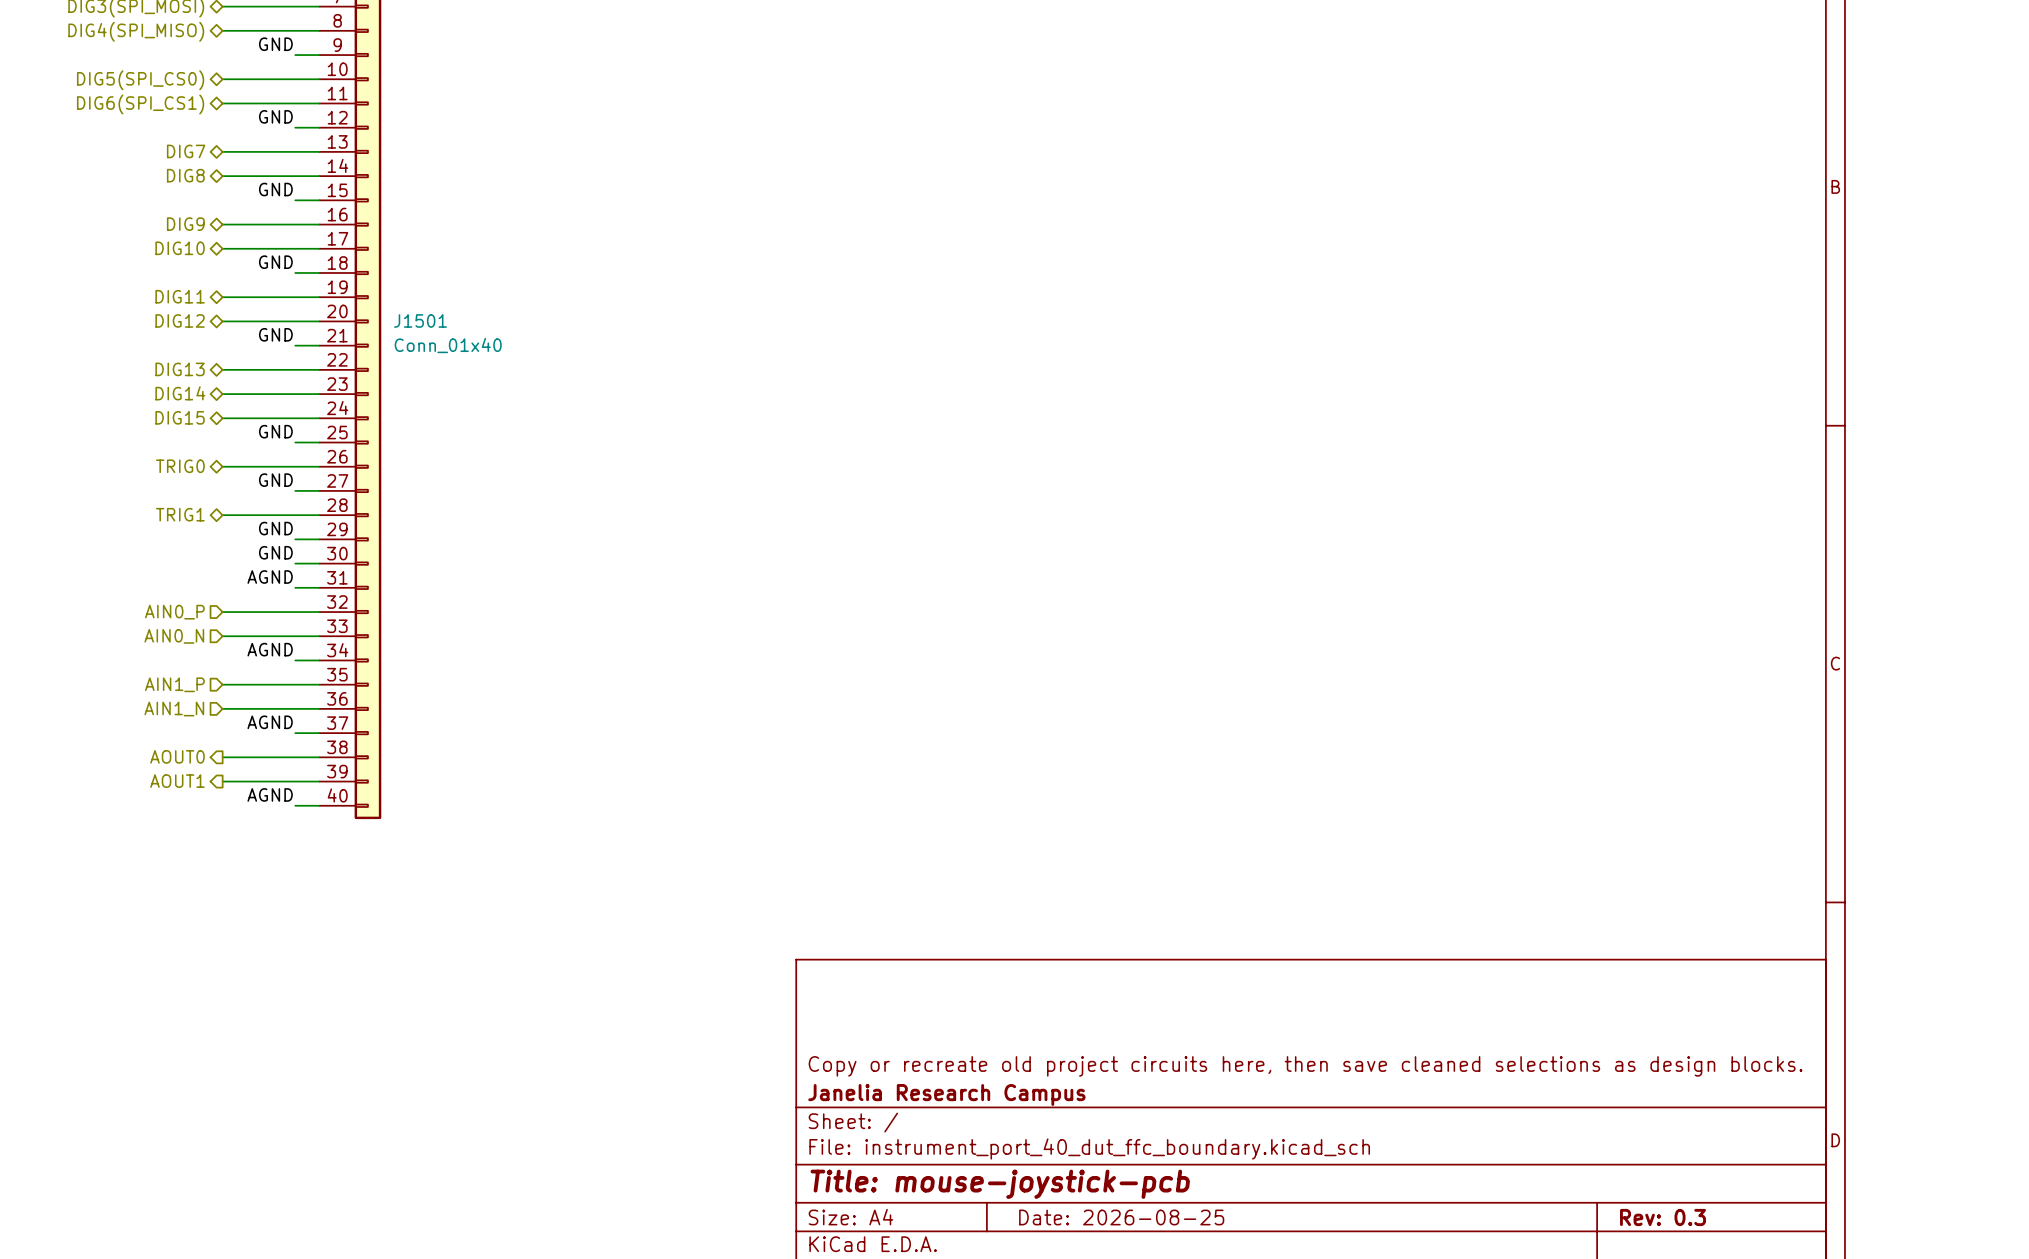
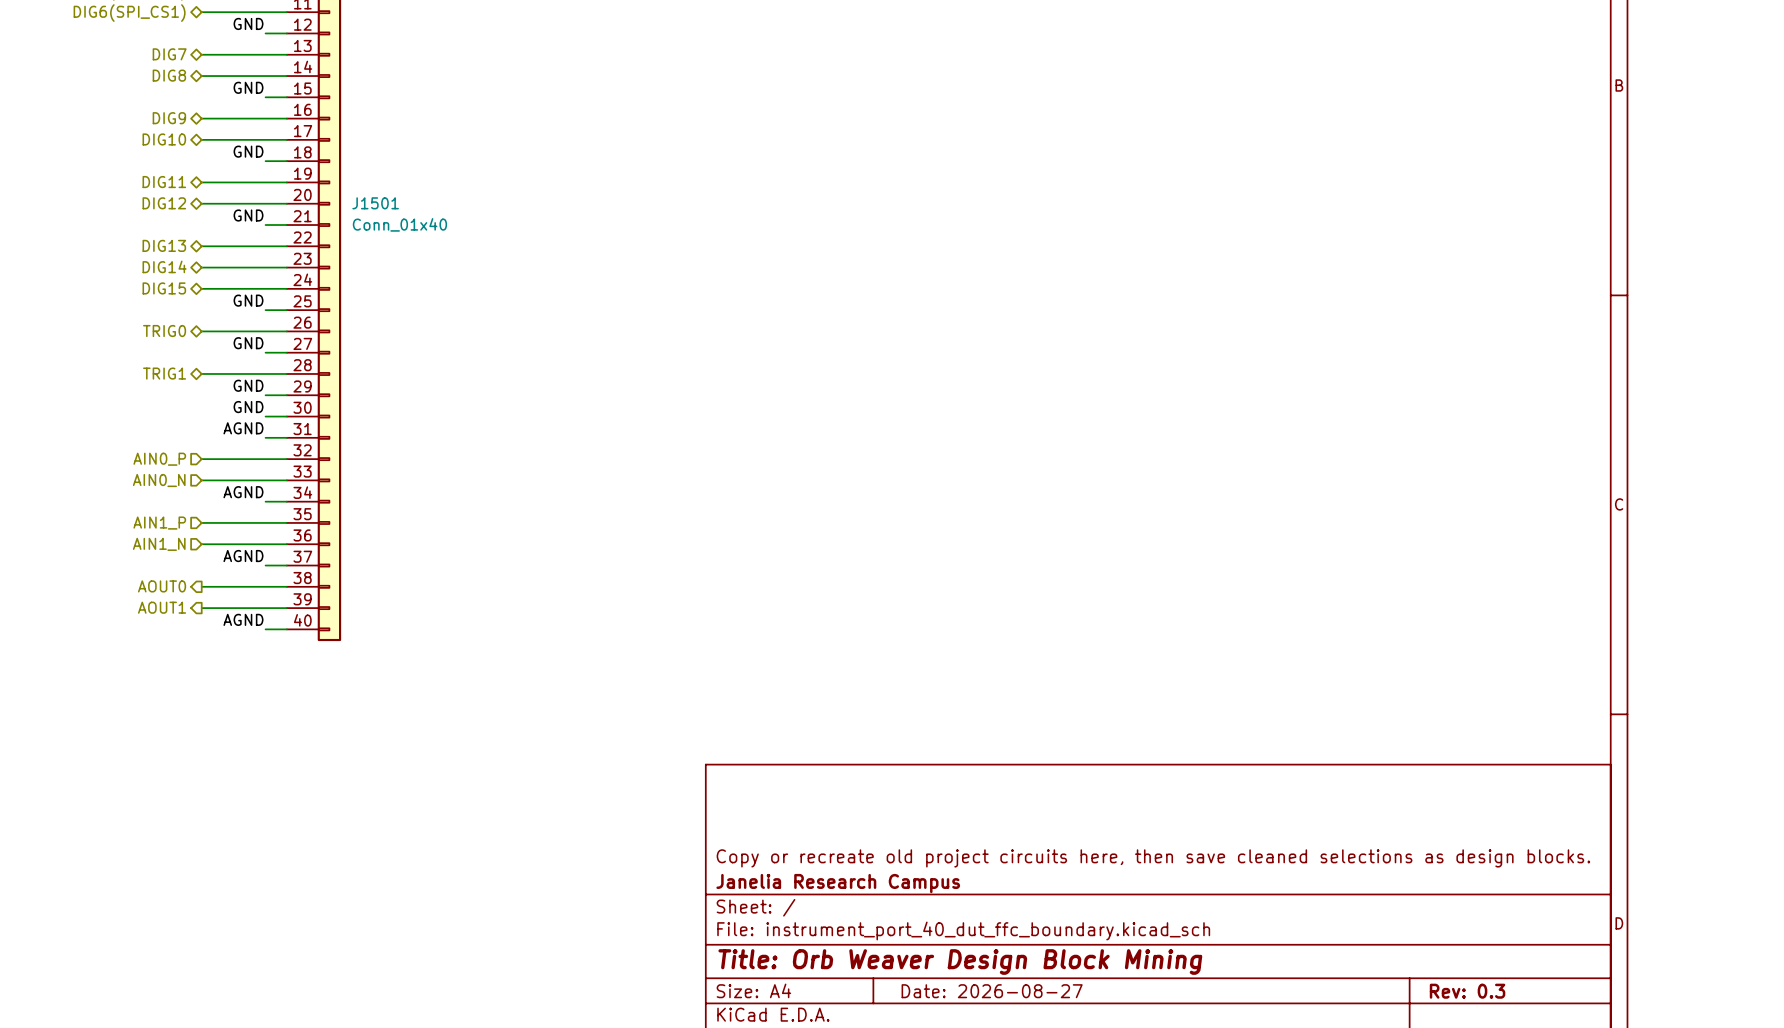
title block: Title: mouse-joystick-pcb (1000, 1184) -> Title: Orb Weaver Design Block Mining (960, 962)
title block: Date: 2026-08-25 (1121, 1217) -> Date: 2026-08-27 (992, 991)

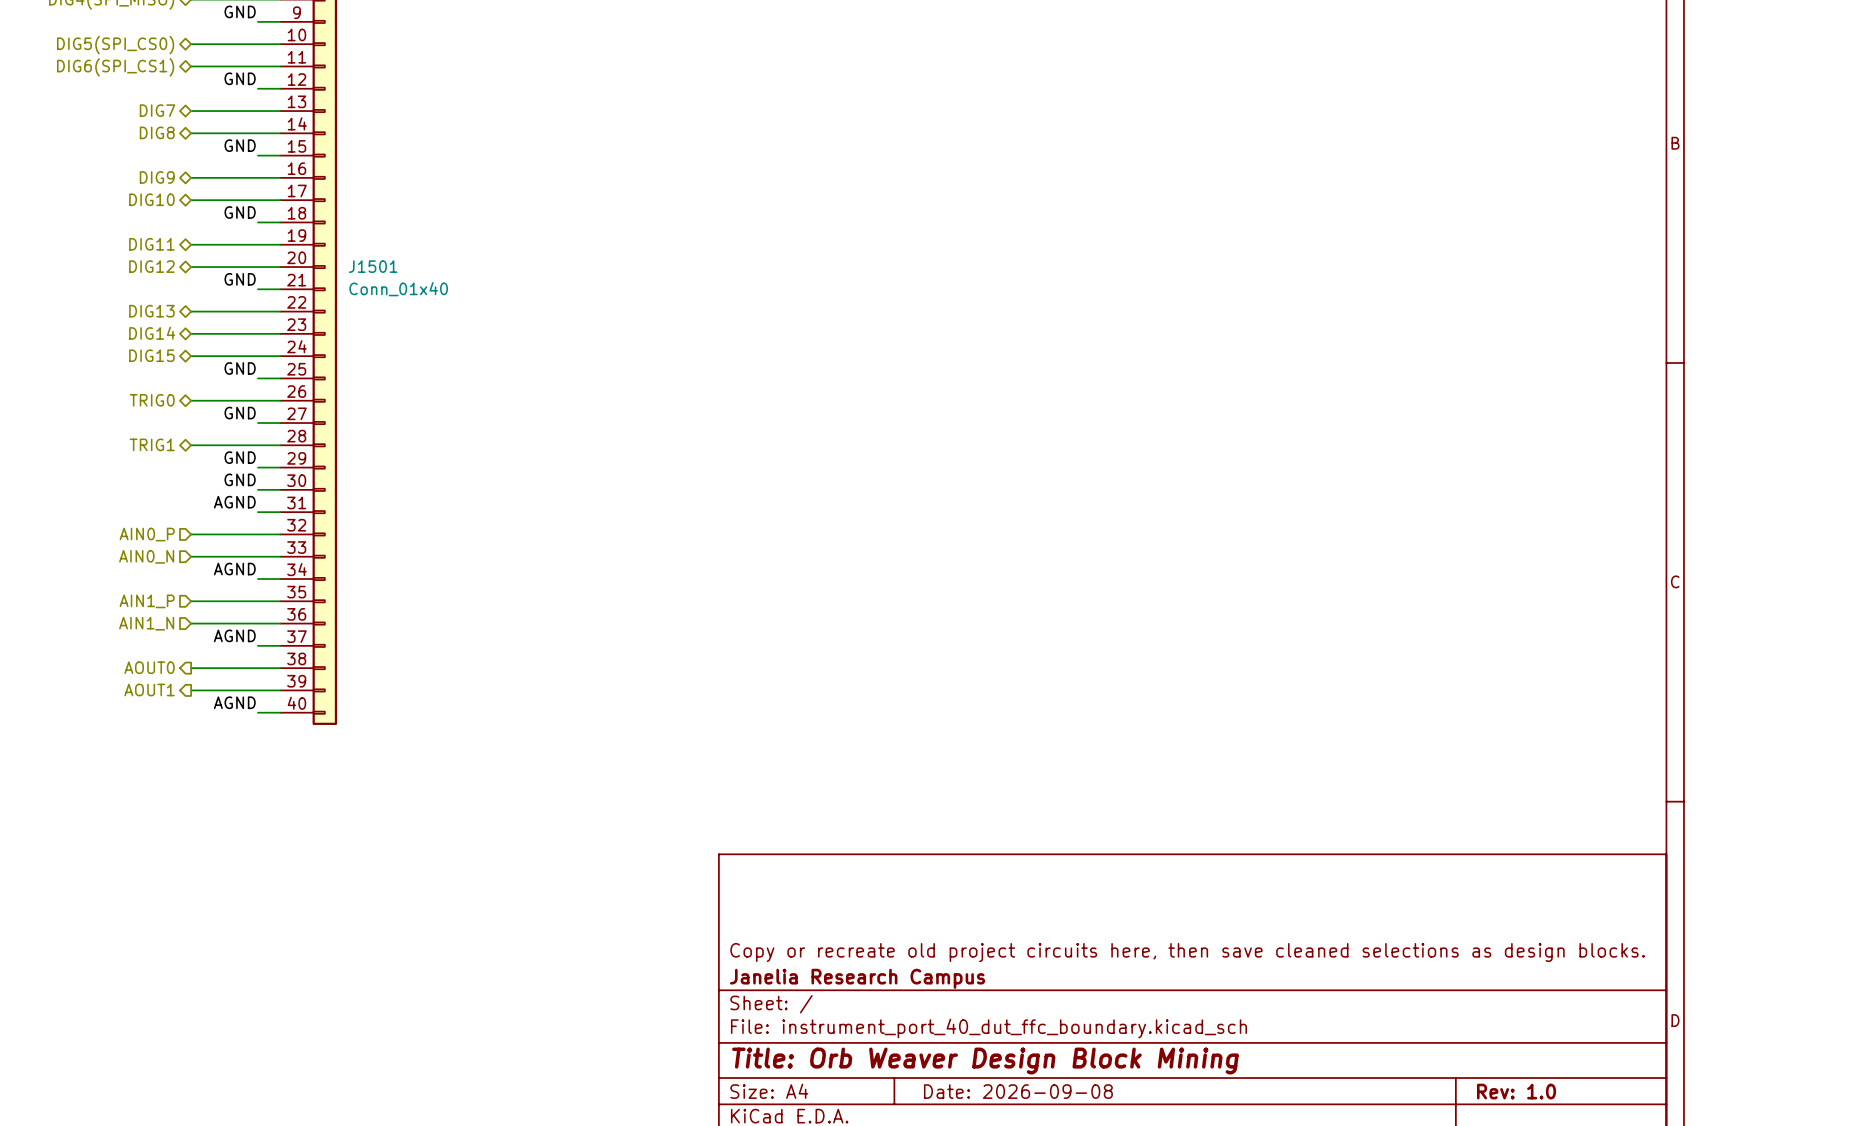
title block: Date: 2026-08-27 (992, 991) -> Date: 2026-09-08 (1018, 1091)
title block: Rev: 0.3 (1467, 991) -> Rev: 1.0 (1516, 1091)

